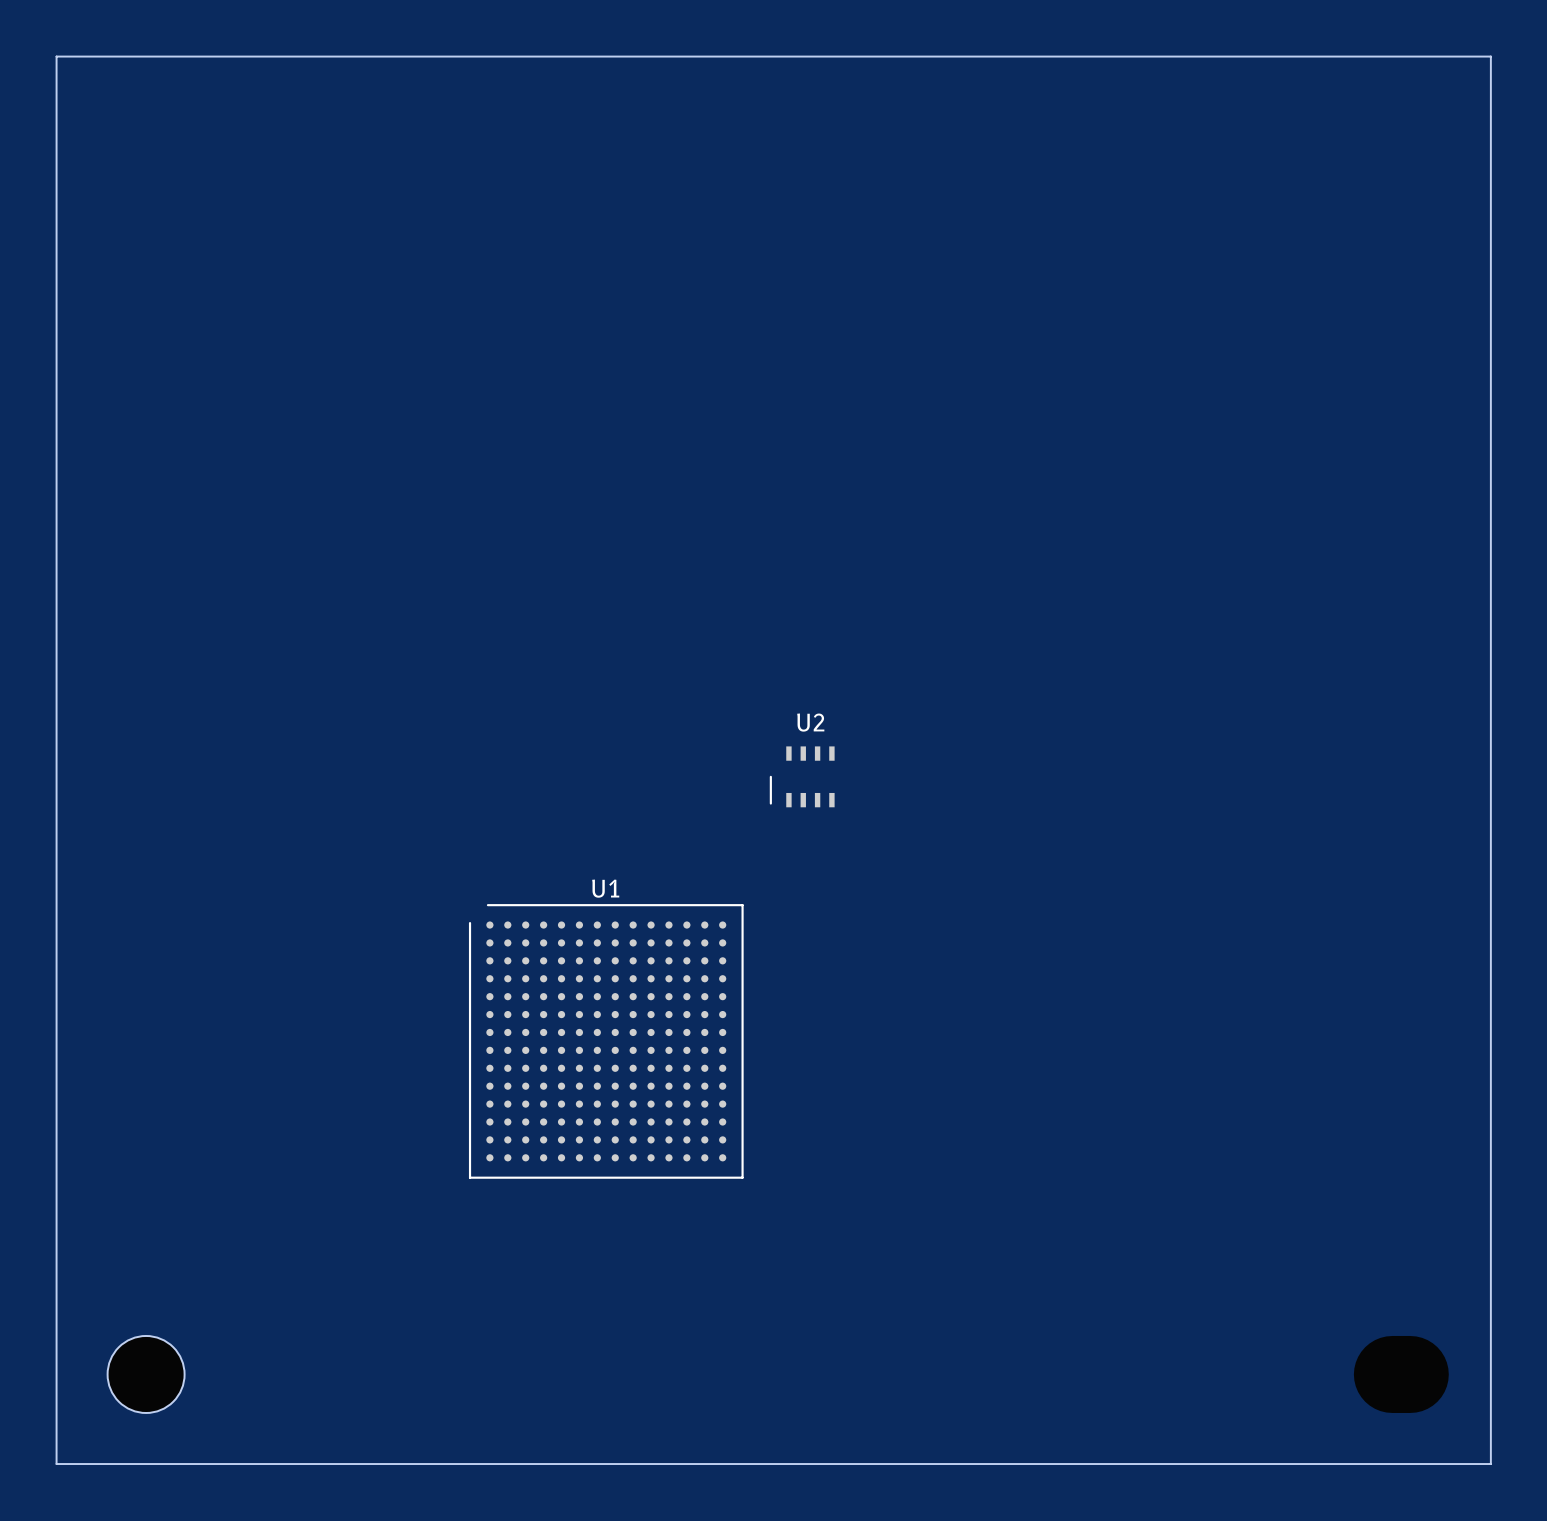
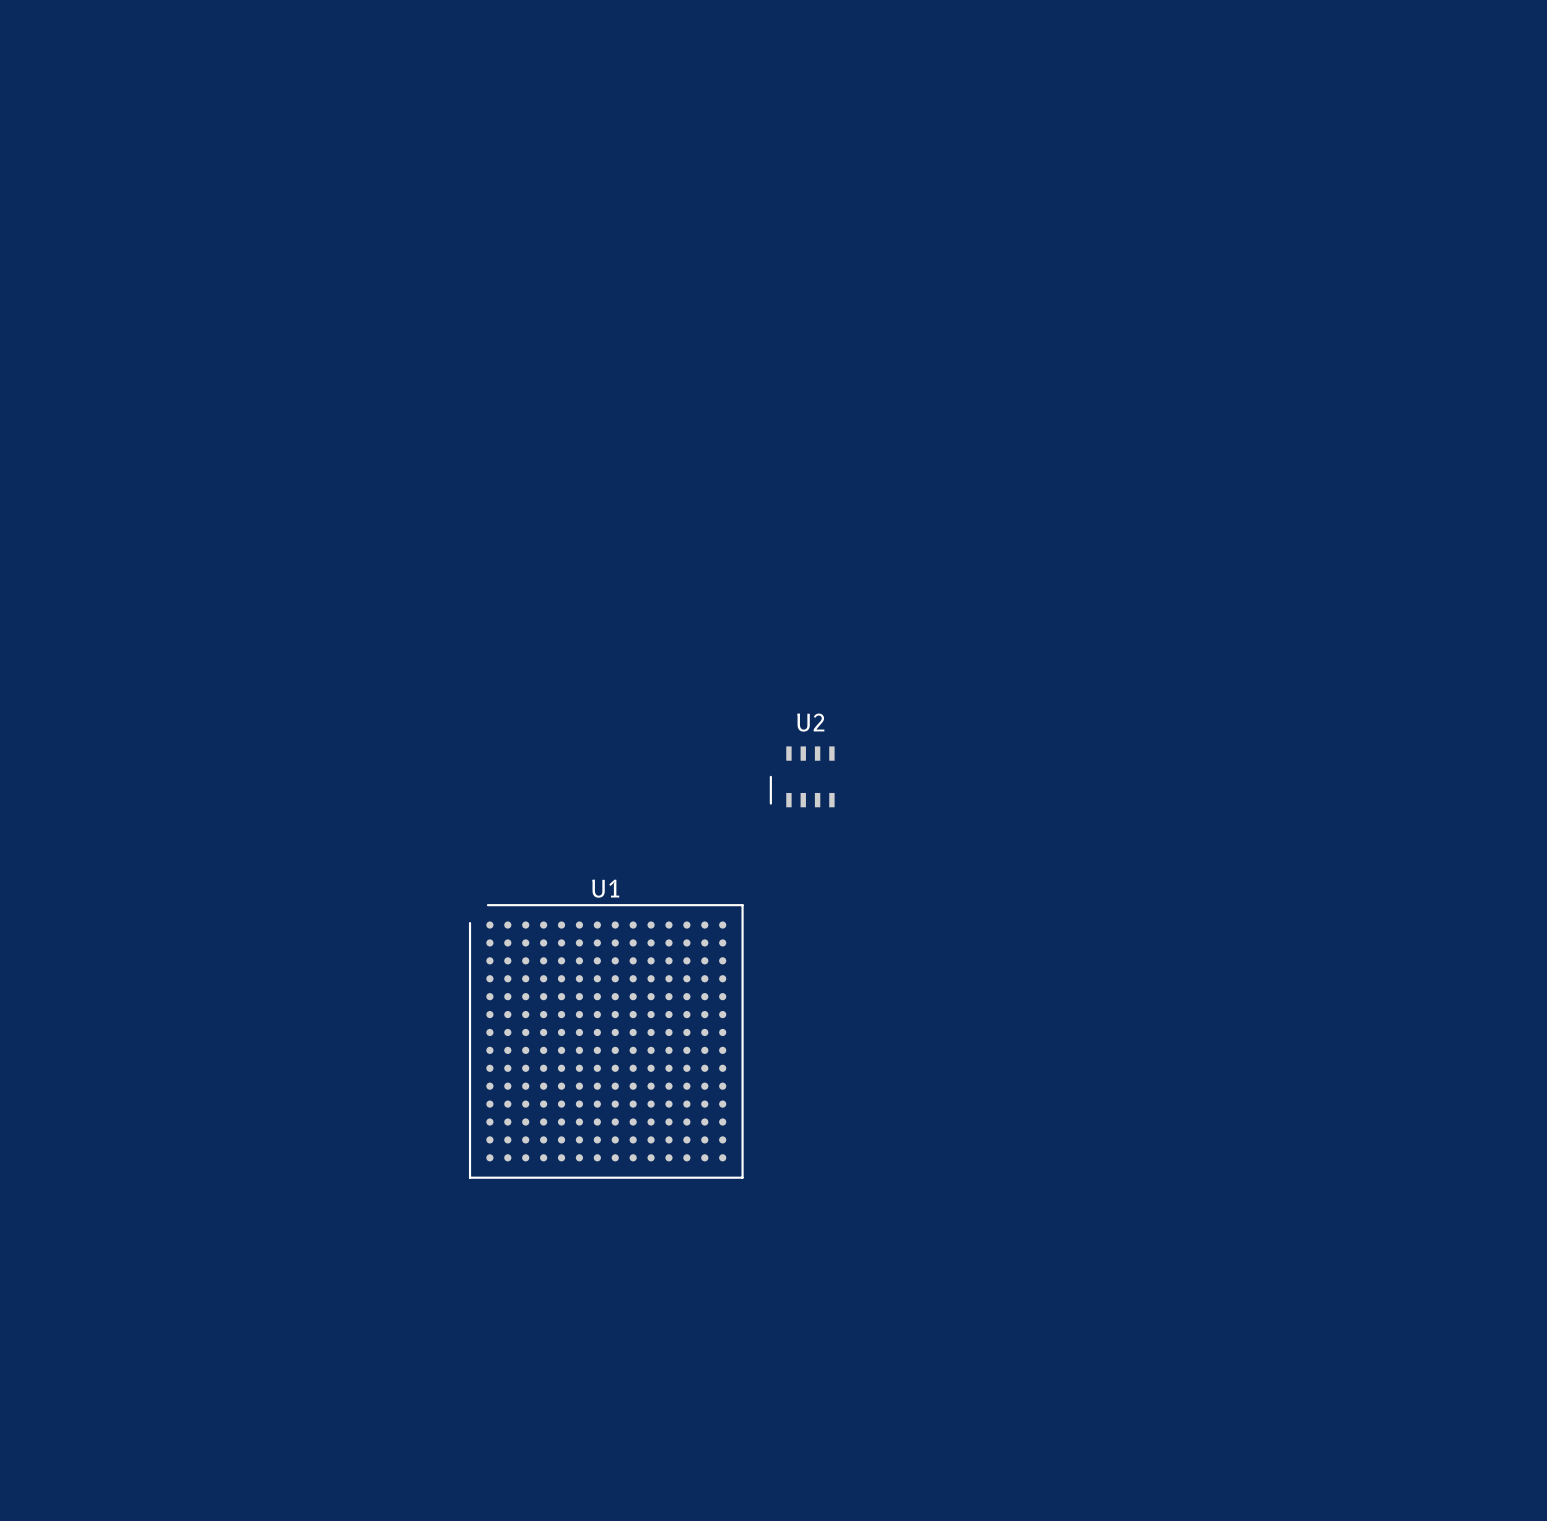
board edge: (56, 56) (56, 1464) (1490, 1464) (1490, 56) (56, 56) -> none
part: (146, 1374) -> none
part: (1401, 1374) -> none

